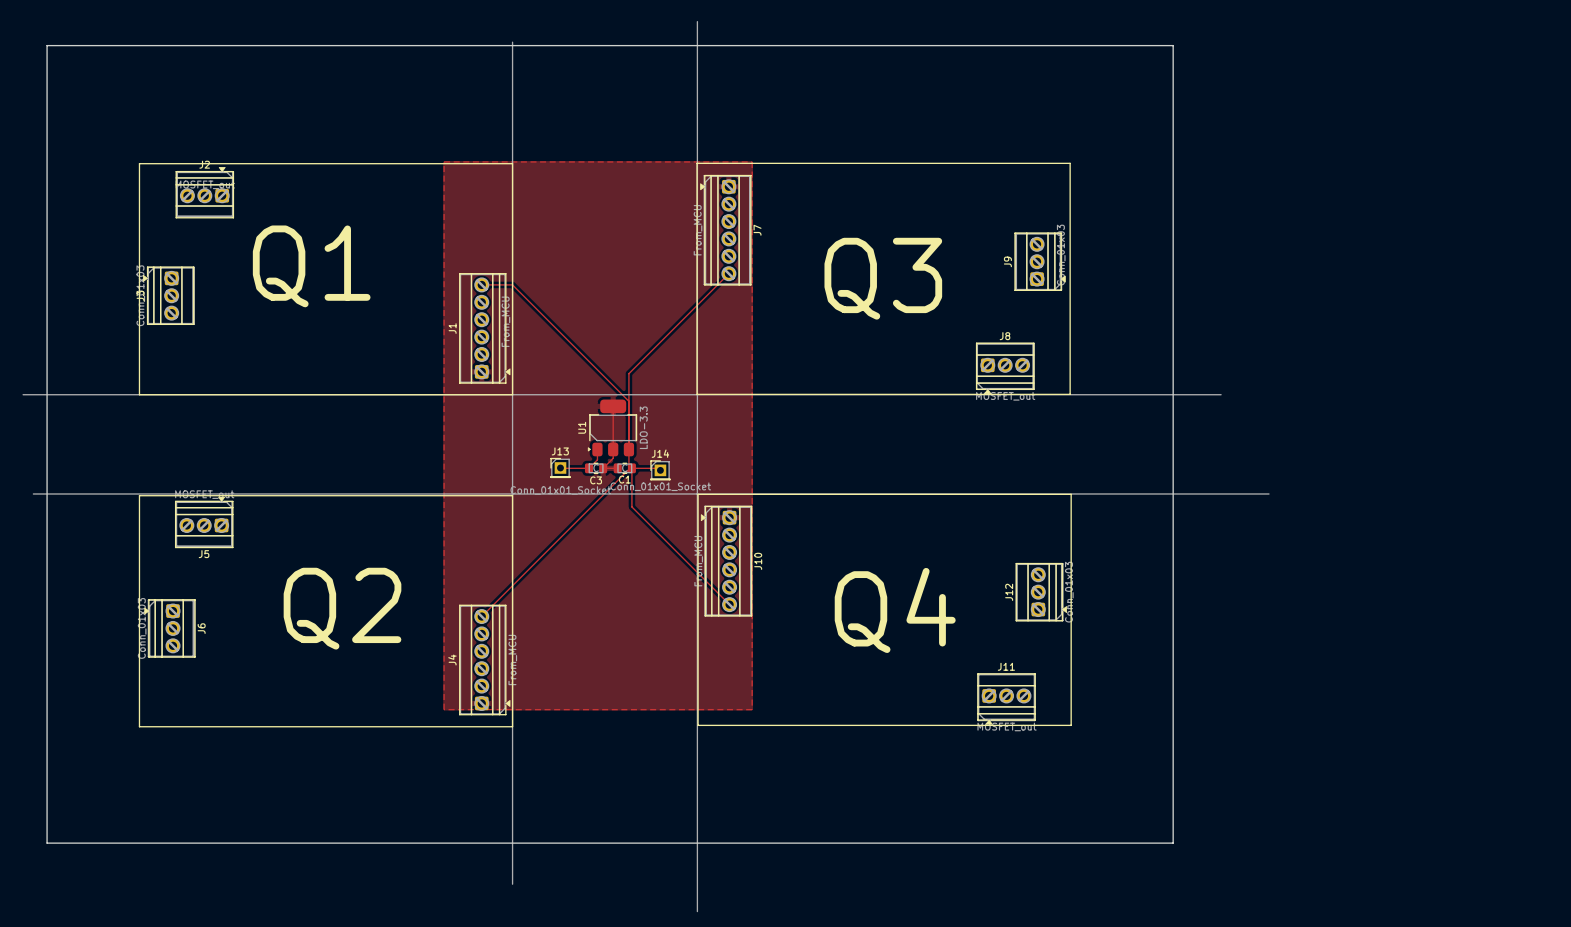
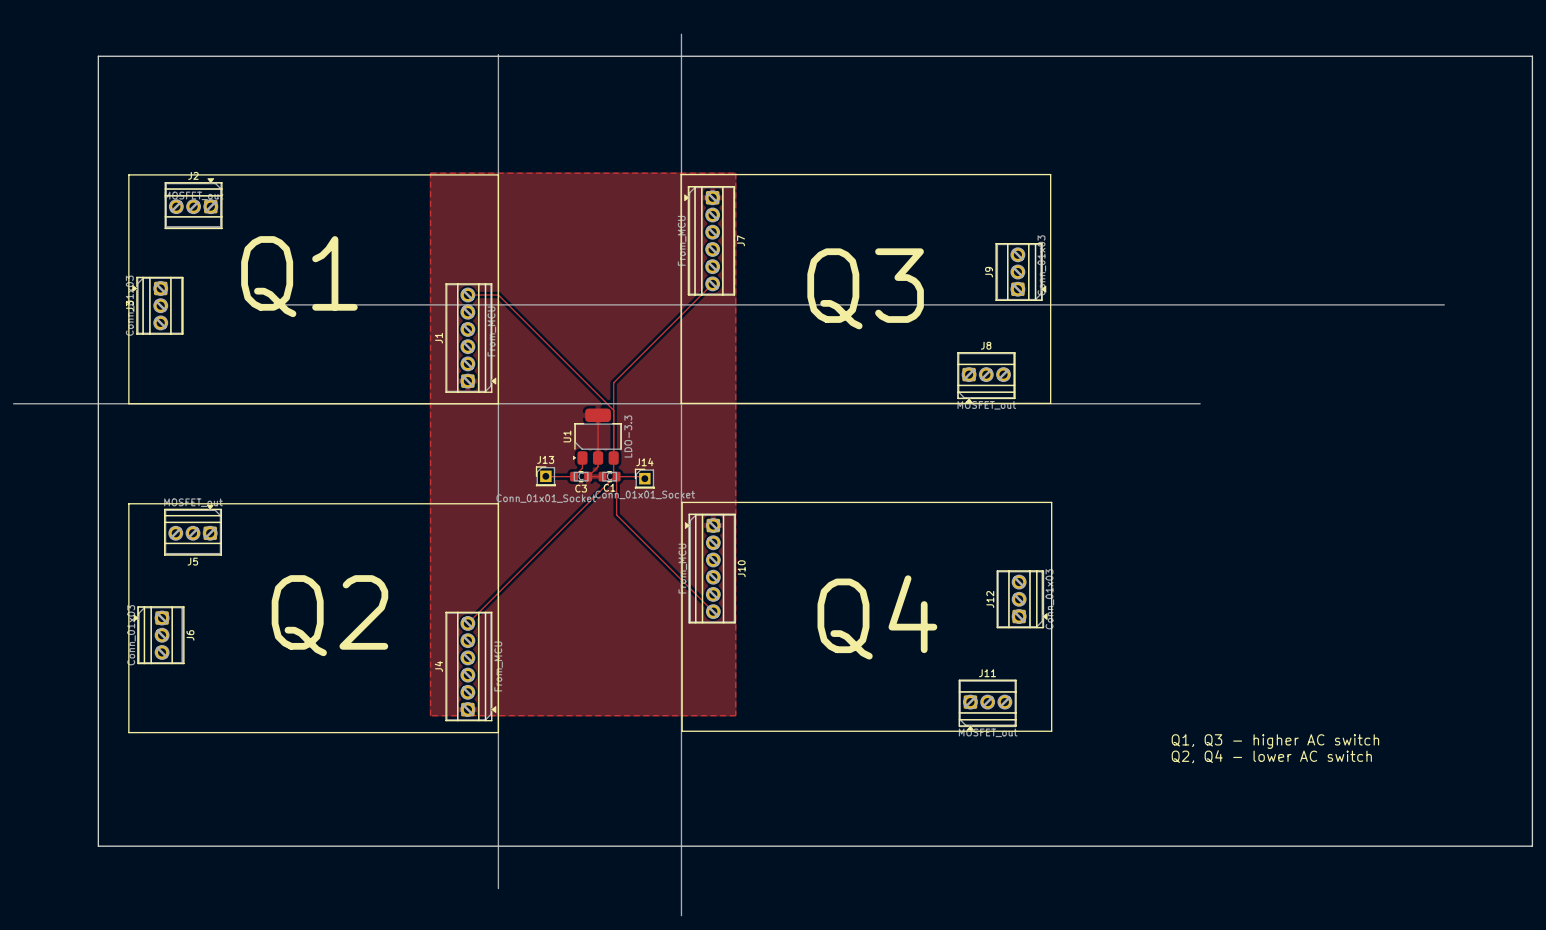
board edge: (47, 45) (1173, 45) (1173, 843) (47, 843) (47, 45) -> (98, 56) (98, 846) (1532, 846) (1532, 56) (98, 56)
line: none -> (257, 304) (1444, 304)
line: (33, 493) (1269, 493) -> none
text: none -> Q1, Q3 - higher AC switch (1275, 741)
text: none -> Q2, Q4 - lower AC switch (1271, 756)

